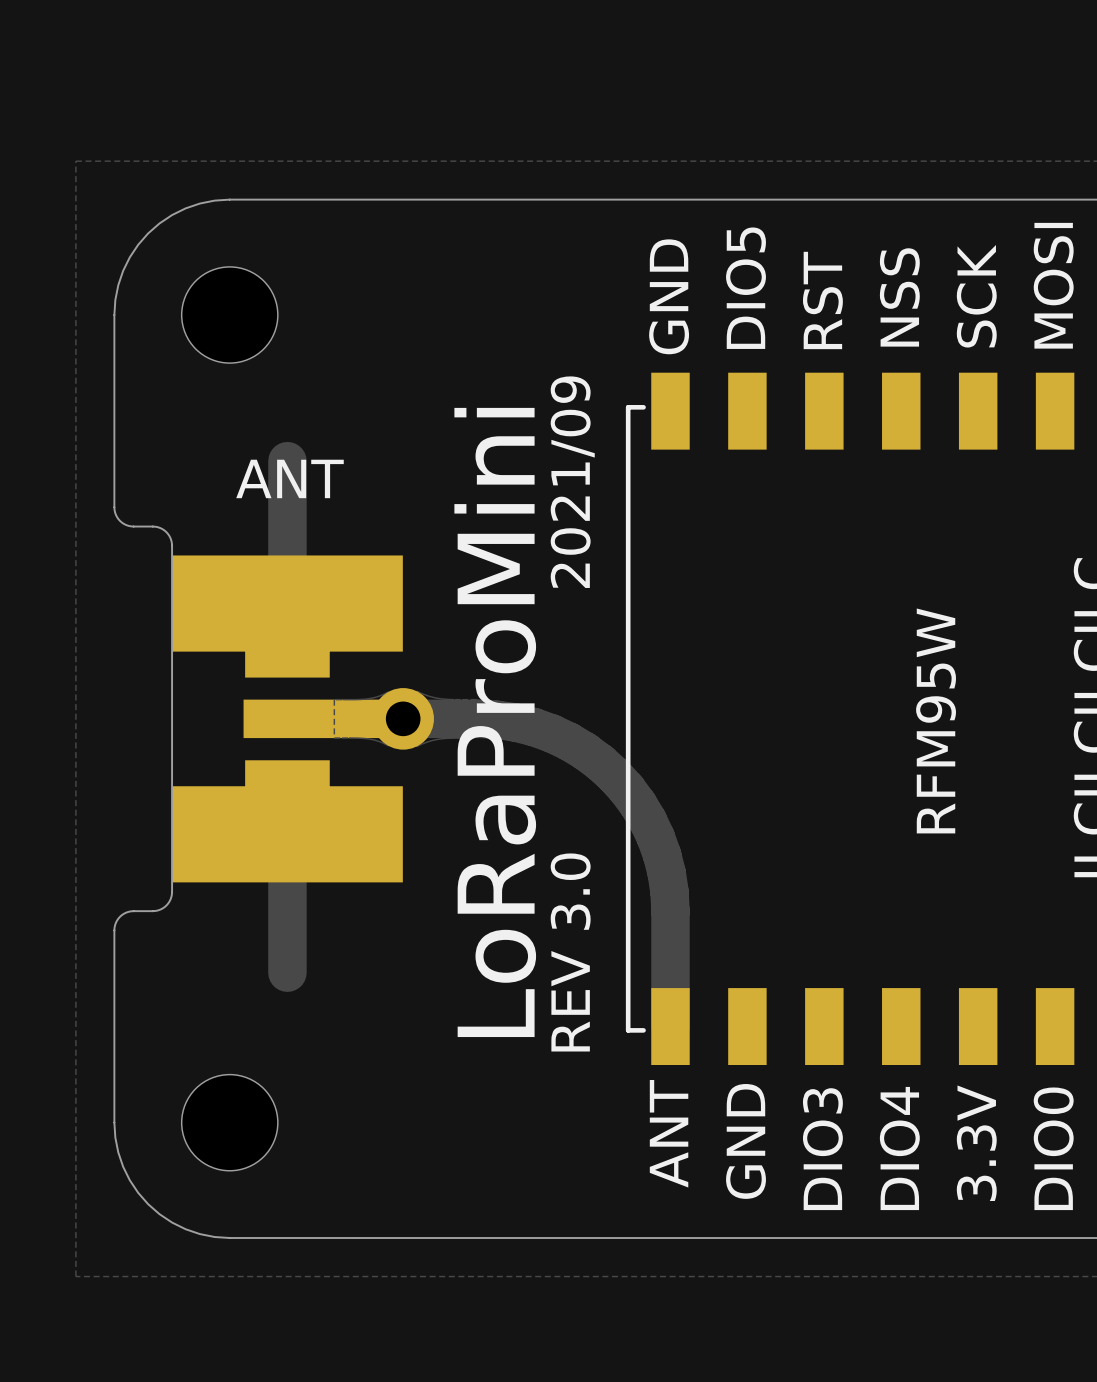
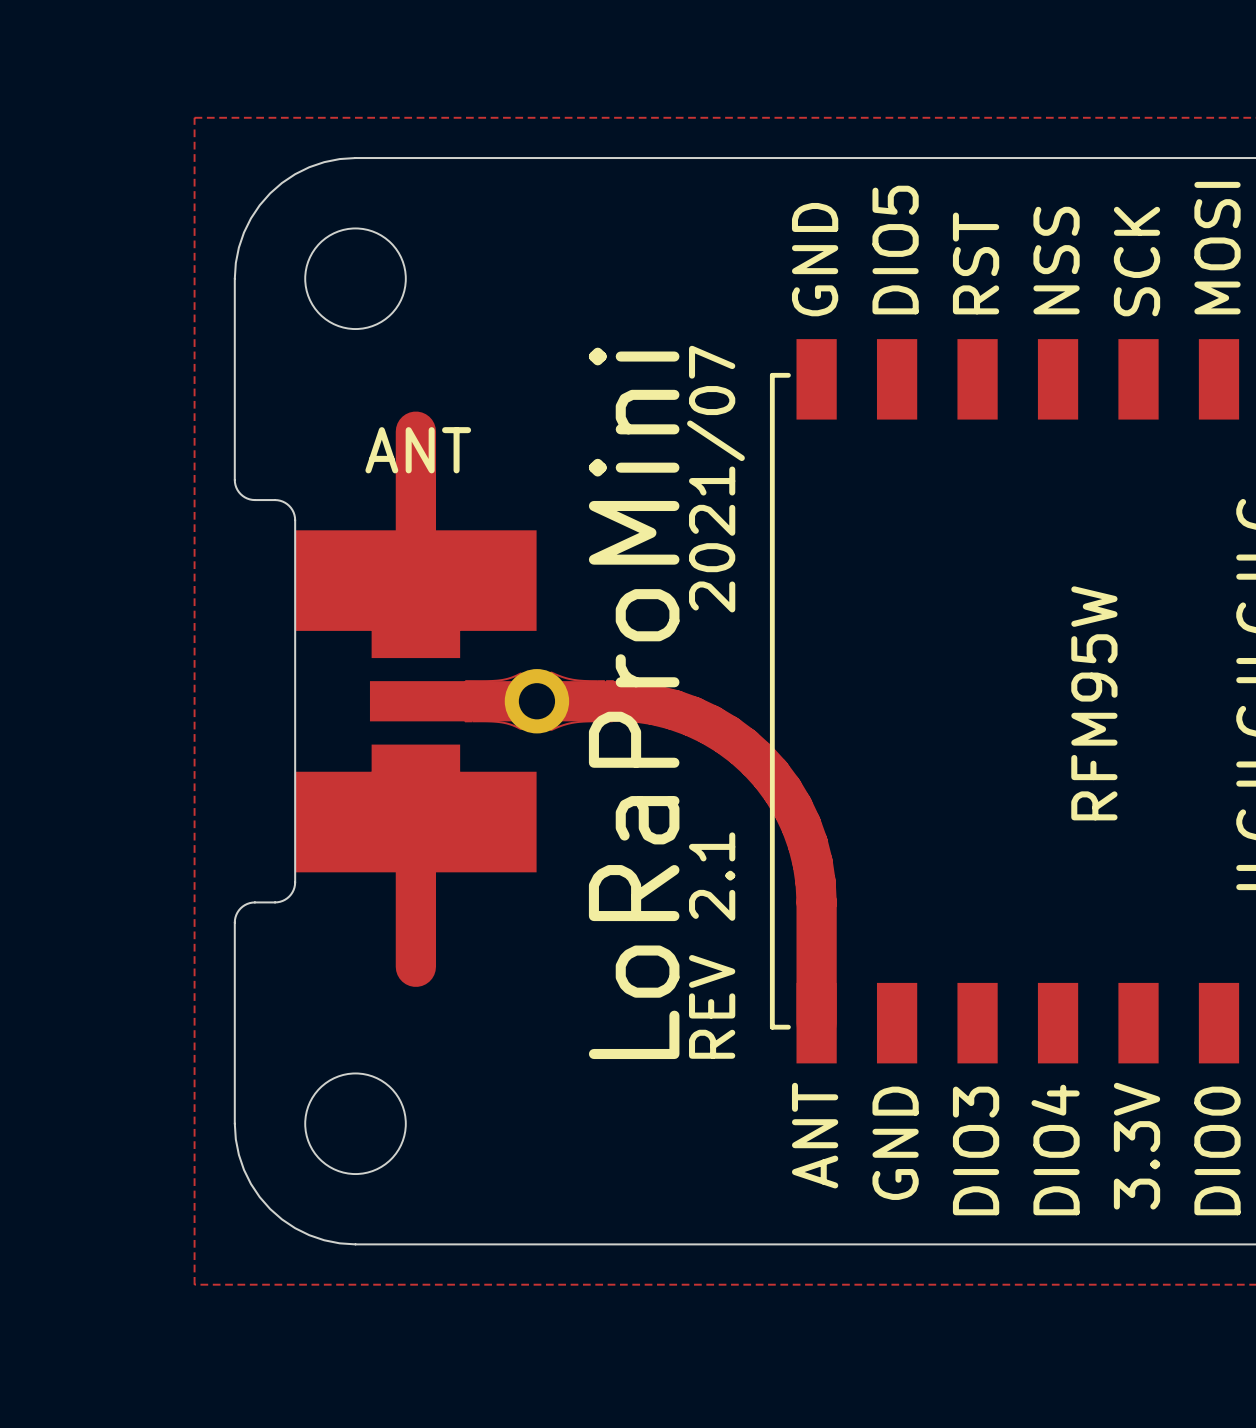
text: 2021/09 (572, 482) -> 2021/07 (715, 479)
text: REV 3.0 (570, 952) -> REV 2.1 (712, 945)

